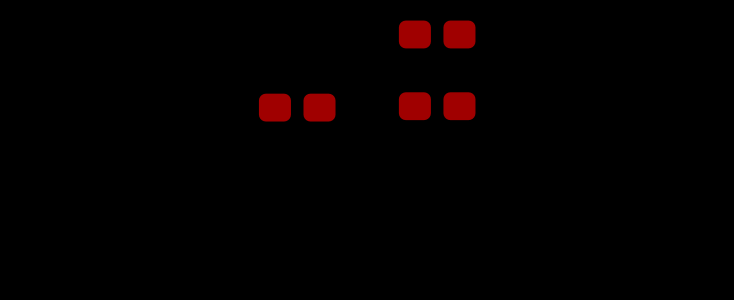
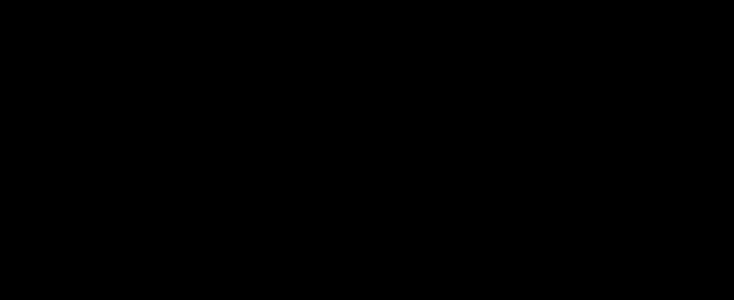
part: (437, 34) -> none
part: (437, 106) -> none
part: (297, 107) -> none

